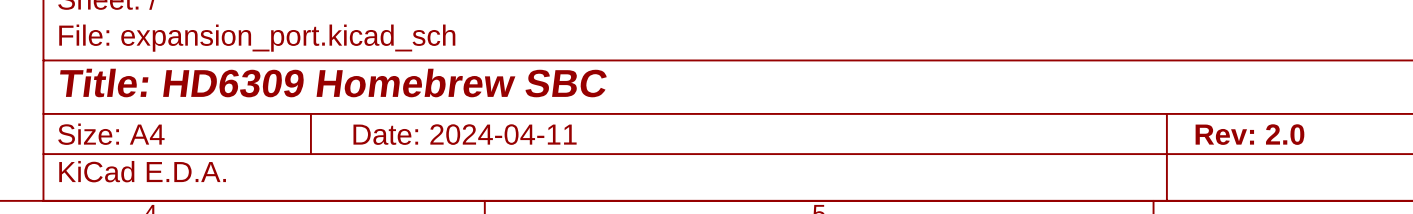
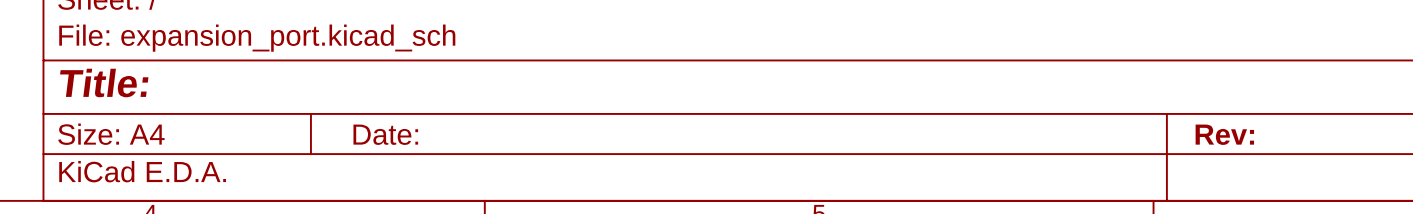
title block: Title: HD6309 Homebrew SBC (333, 83) -> Title: (104, 83)
title block: Date: 2024-04-11 (465, 134) -> Date: (385, 134)
title block: Rev: 2.0 (1249, 134) -> Rev: (1224, 134)

